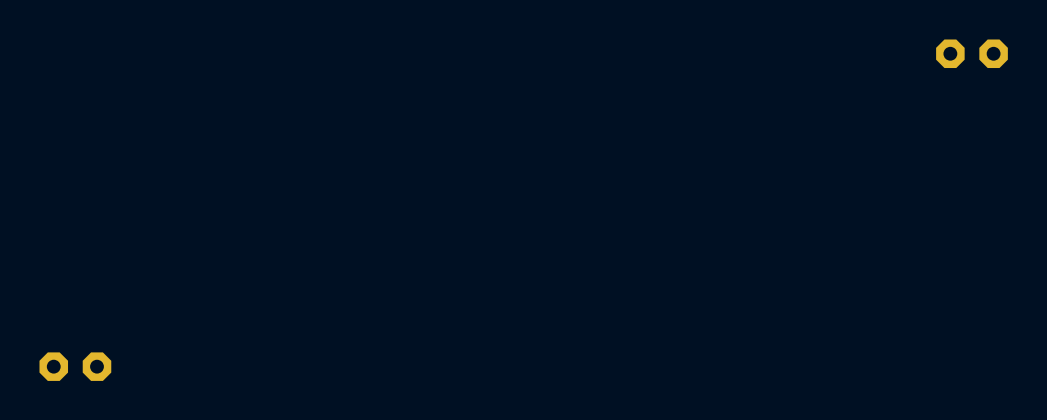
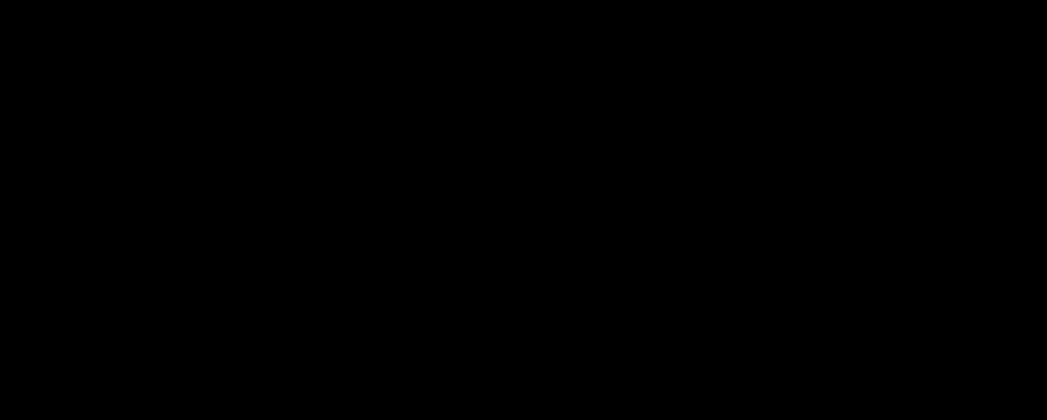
part: (971, 53) -> none
part: (75, 366) -> none

